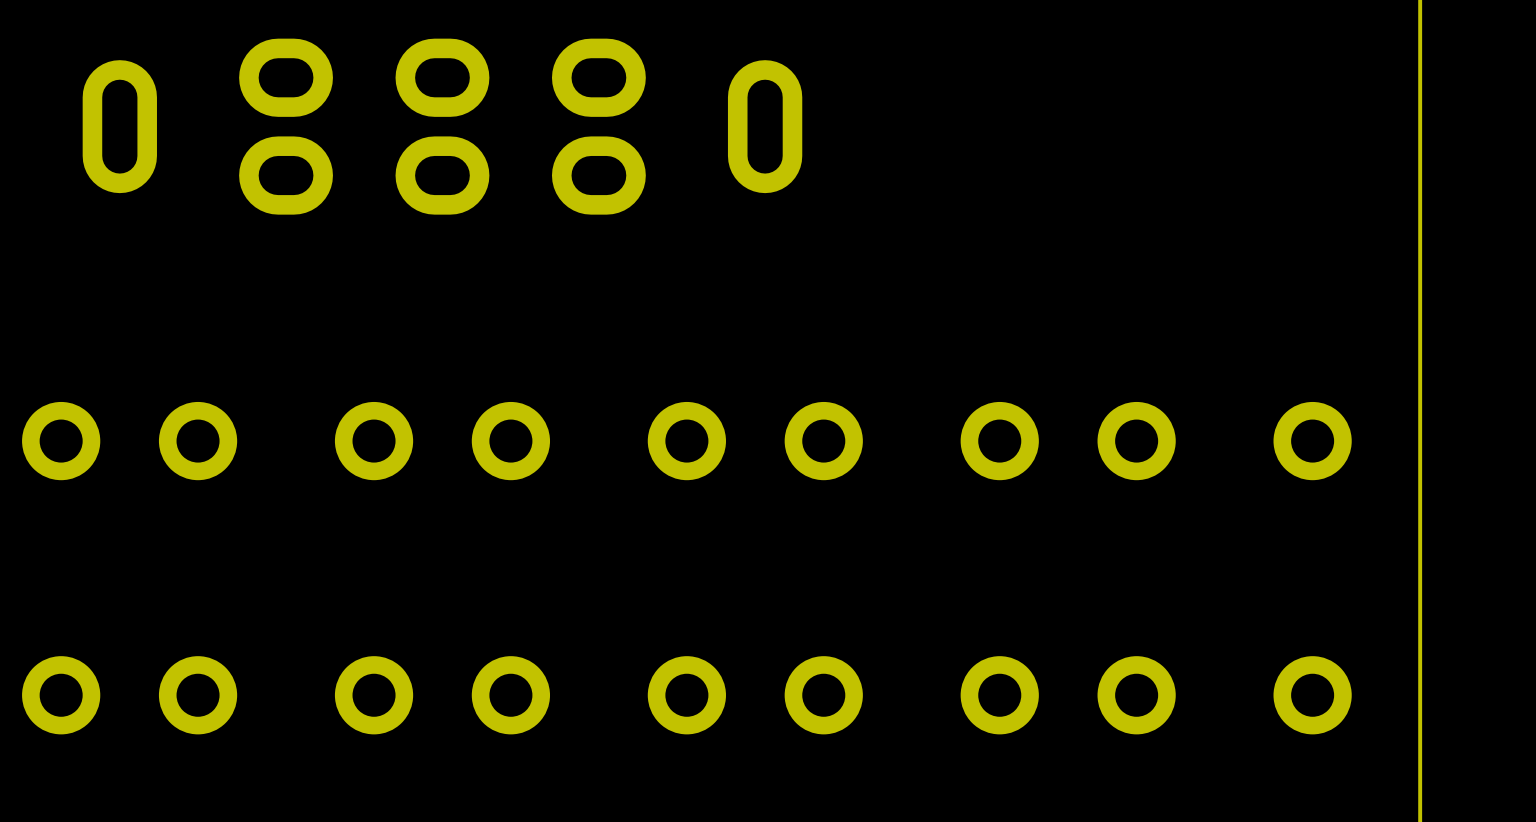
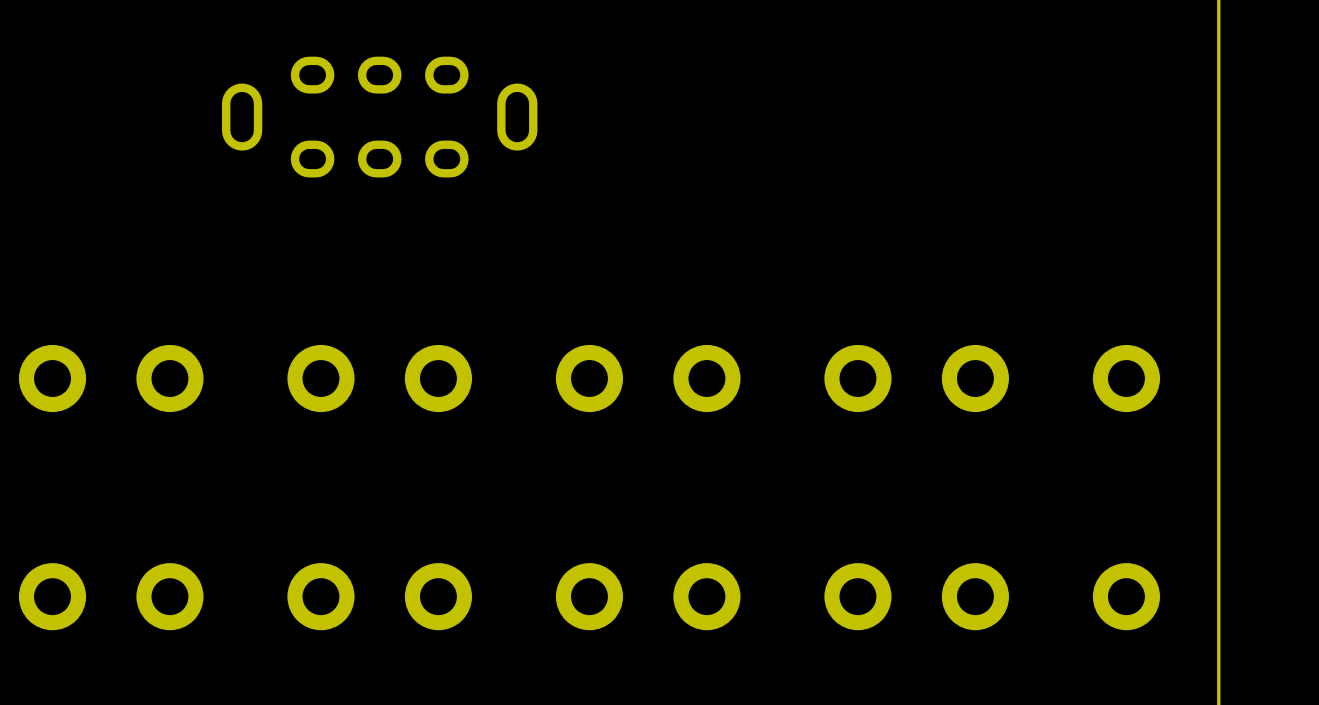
part footprint: [82, 38, 803, 215] -> [221, 56, 538, 178]

